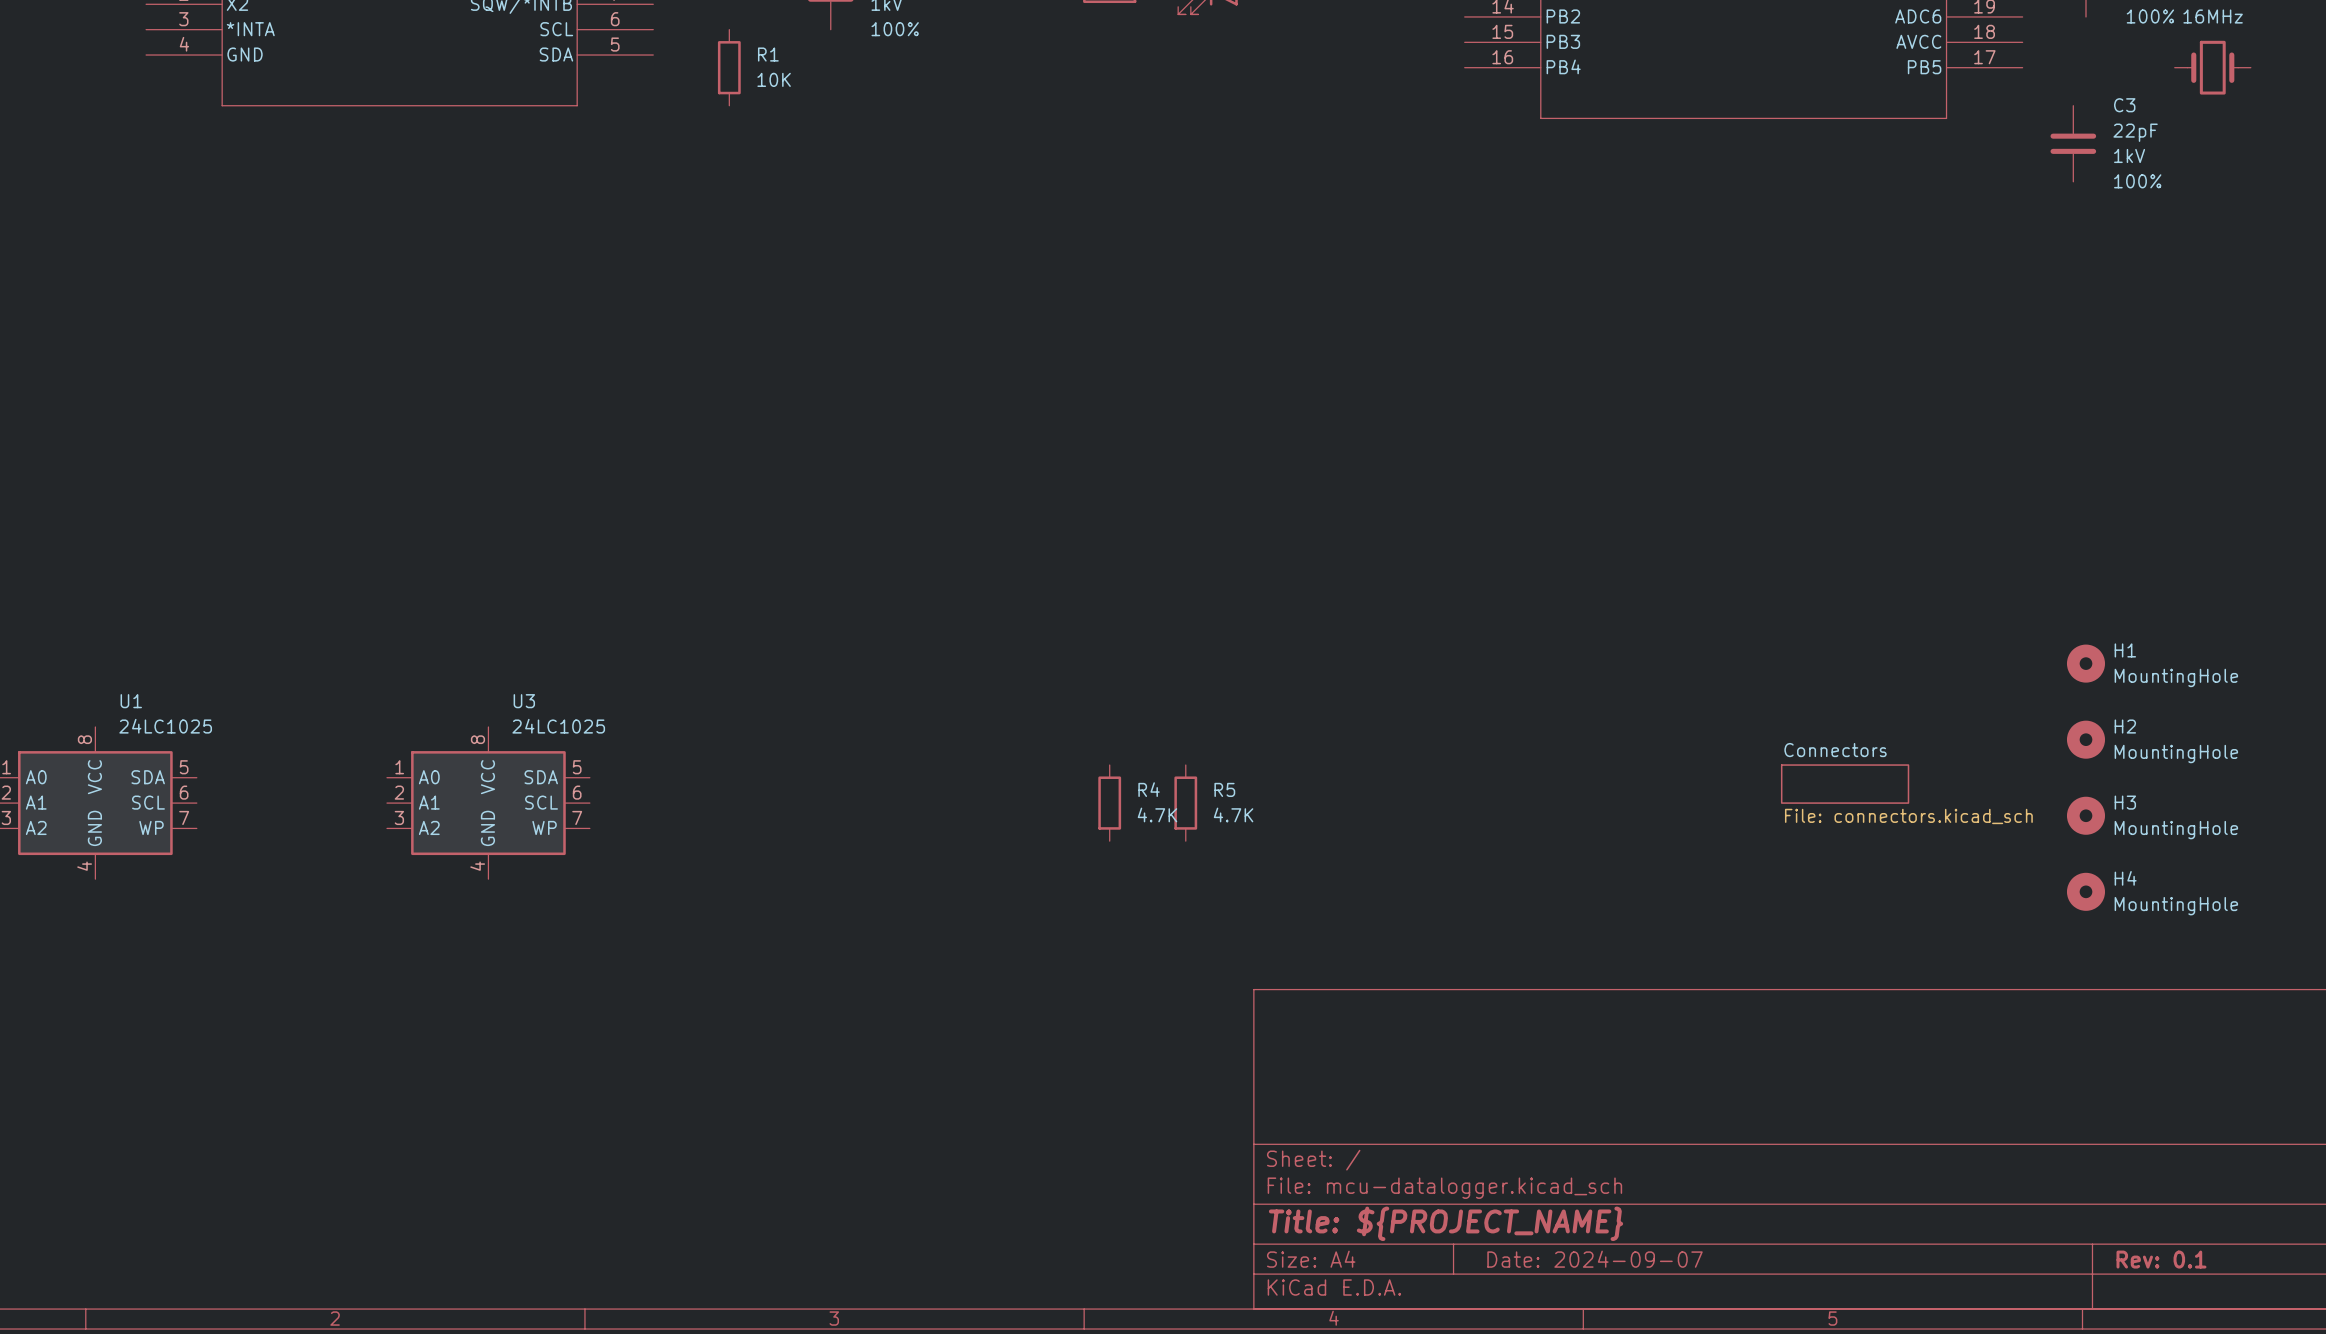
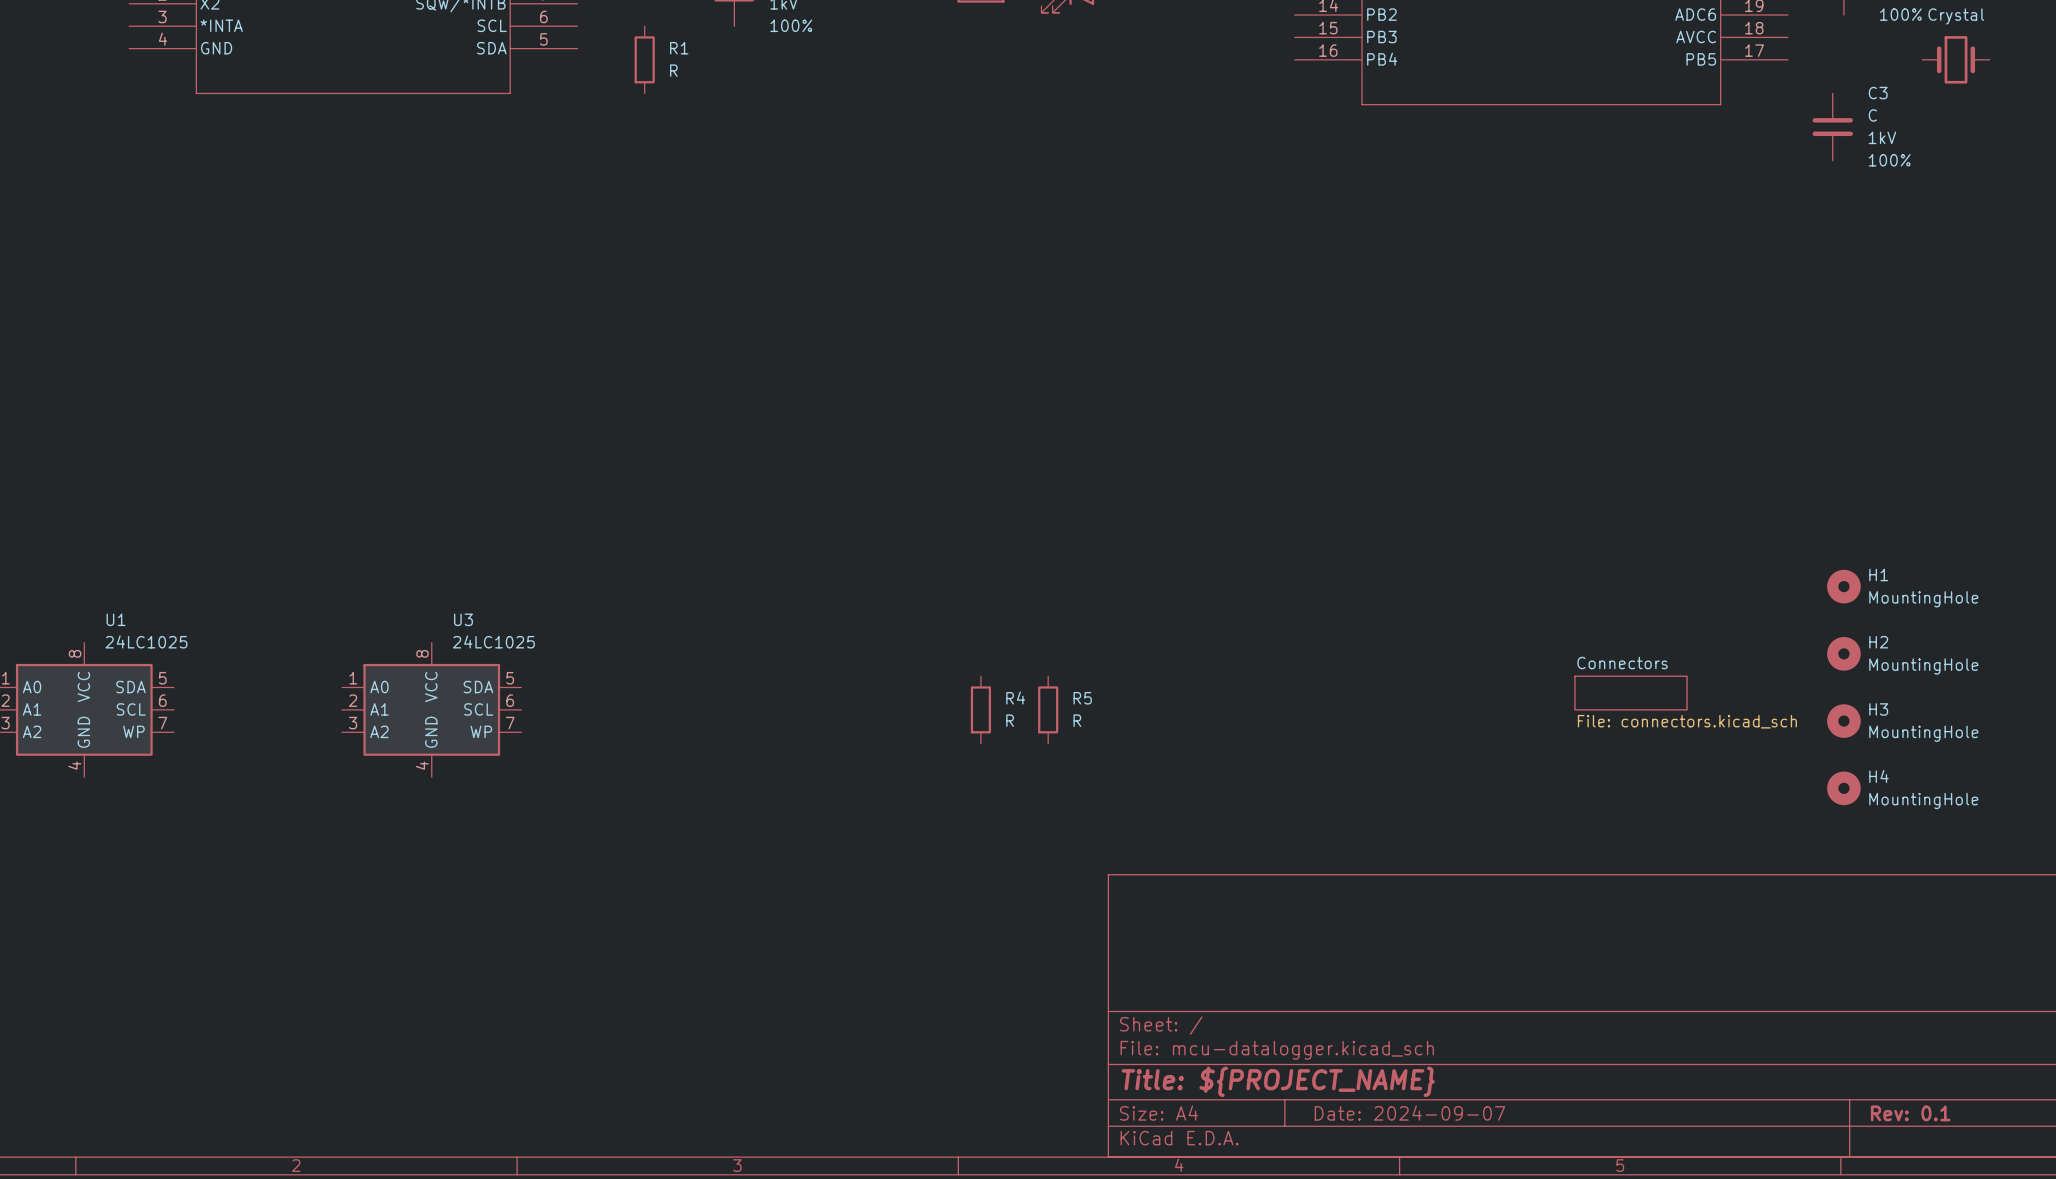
part value: 16MHz (2213, 16) -> Crystal (1956, 16)
R1 value: 10K (774, 79) -> R (673, 70)
C3 value: 22pF (2135, 132) -> C (1872, 115)
R4 value: 4.7K (1157, 814) -> R (1010, 720)
R5 value: 4.7K (1233, 814) -> R (1077, 720)

